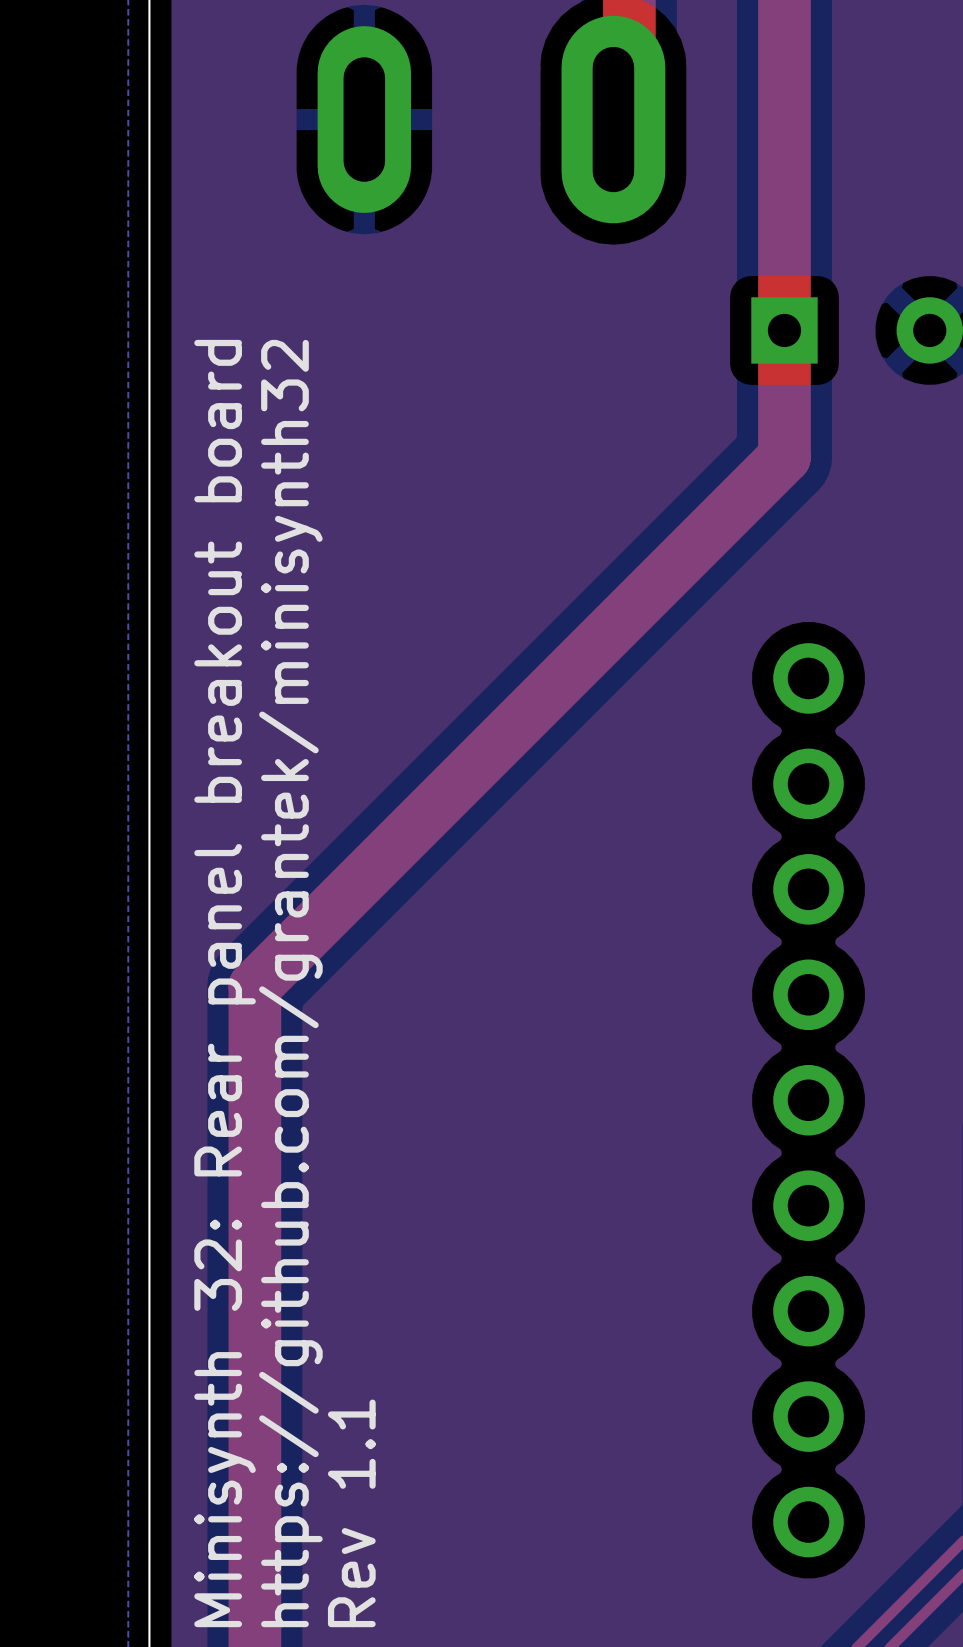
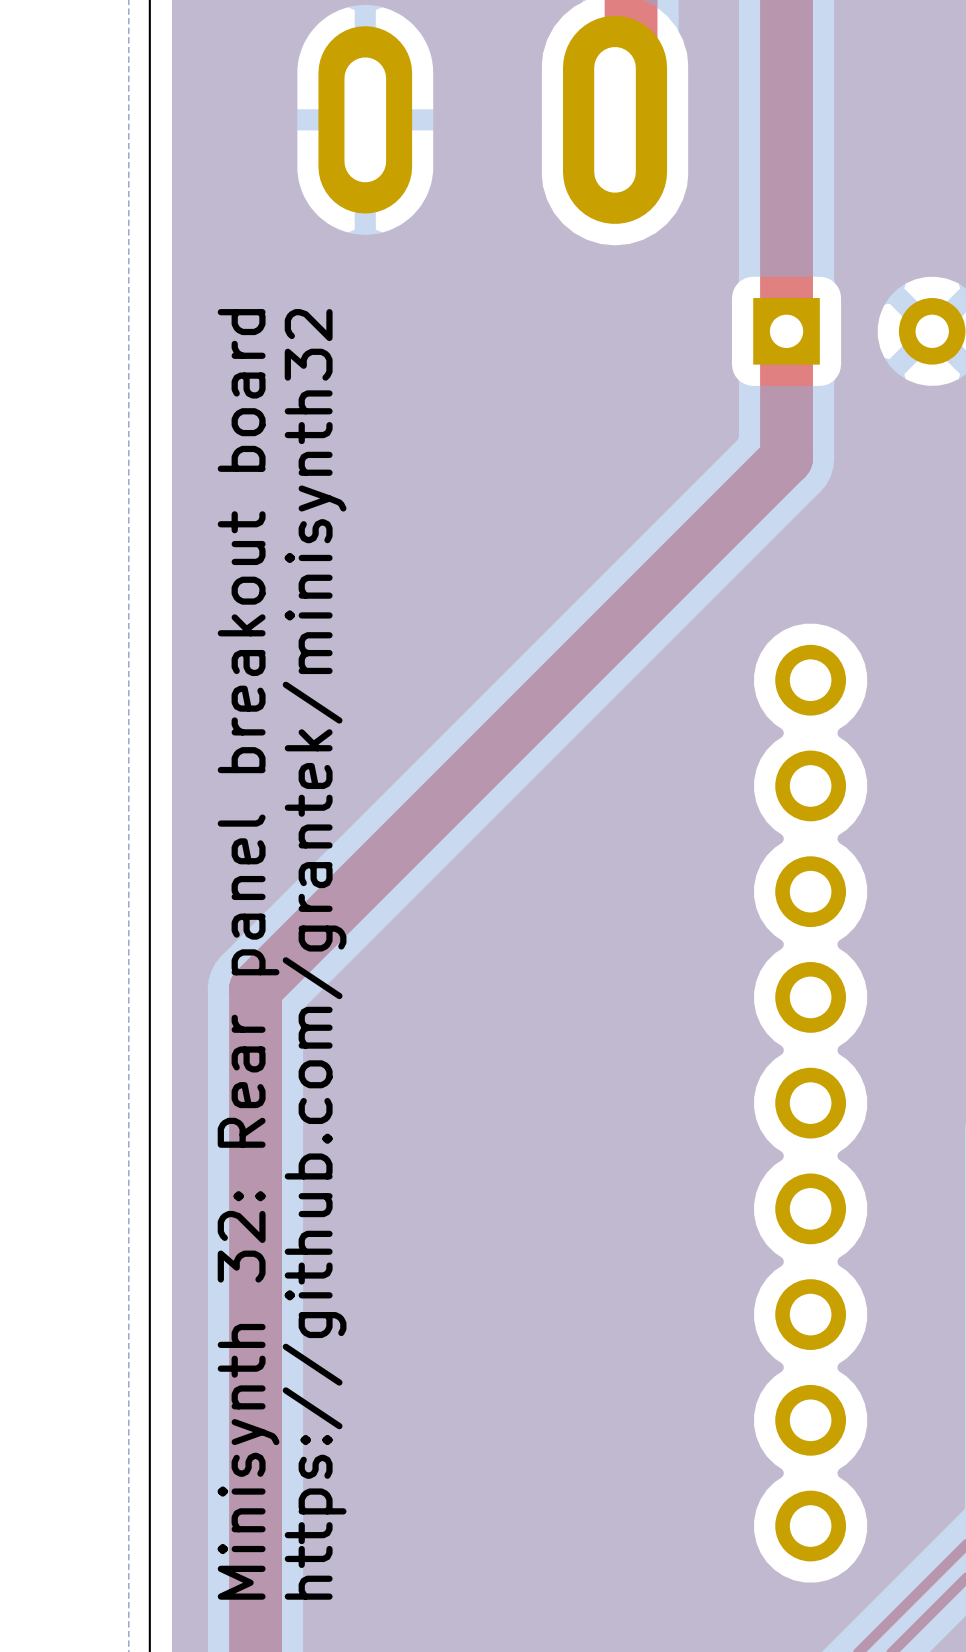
text position: Minisynth 32: Rear panel breakout board (225, 983) -> Minisynth 32: Rear panel breakout board (248, 954)
text position: https://github.com/grantek/minisynth32 (290, 983) -> https://github.com/grantek/minisynth32 (314, 954)
text: Rev 1.1 (351, 1513) -> none

